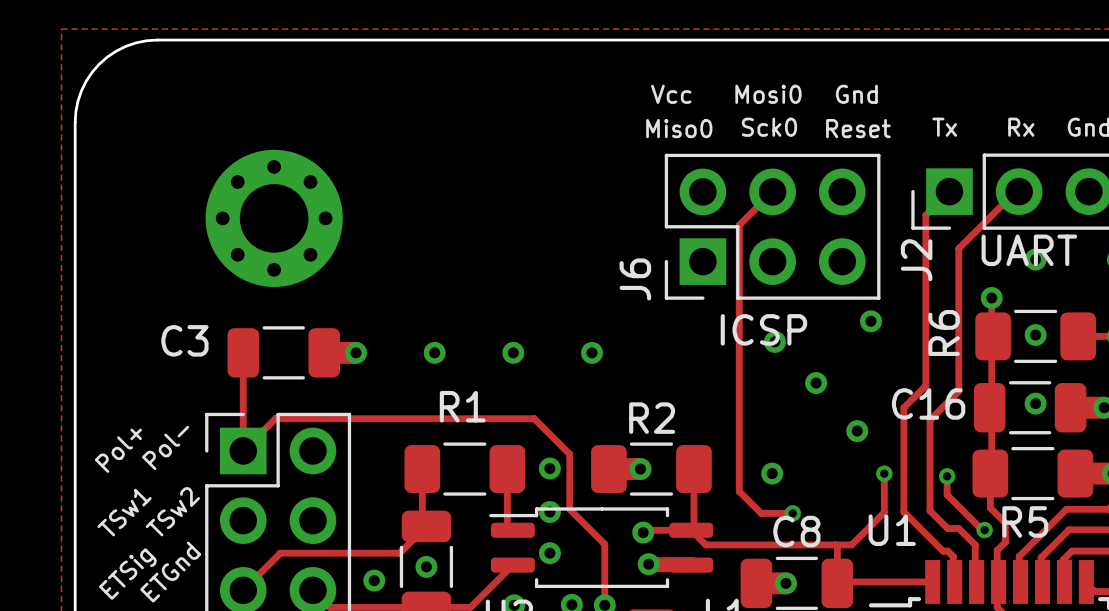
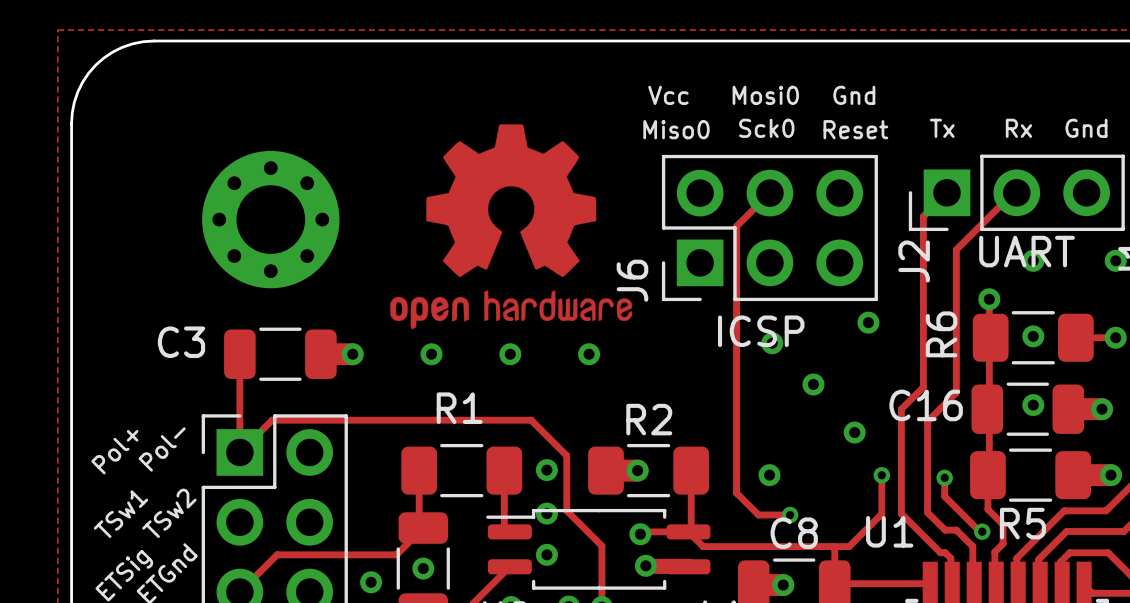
drawing: none -> [390, 124, 633, 330]

